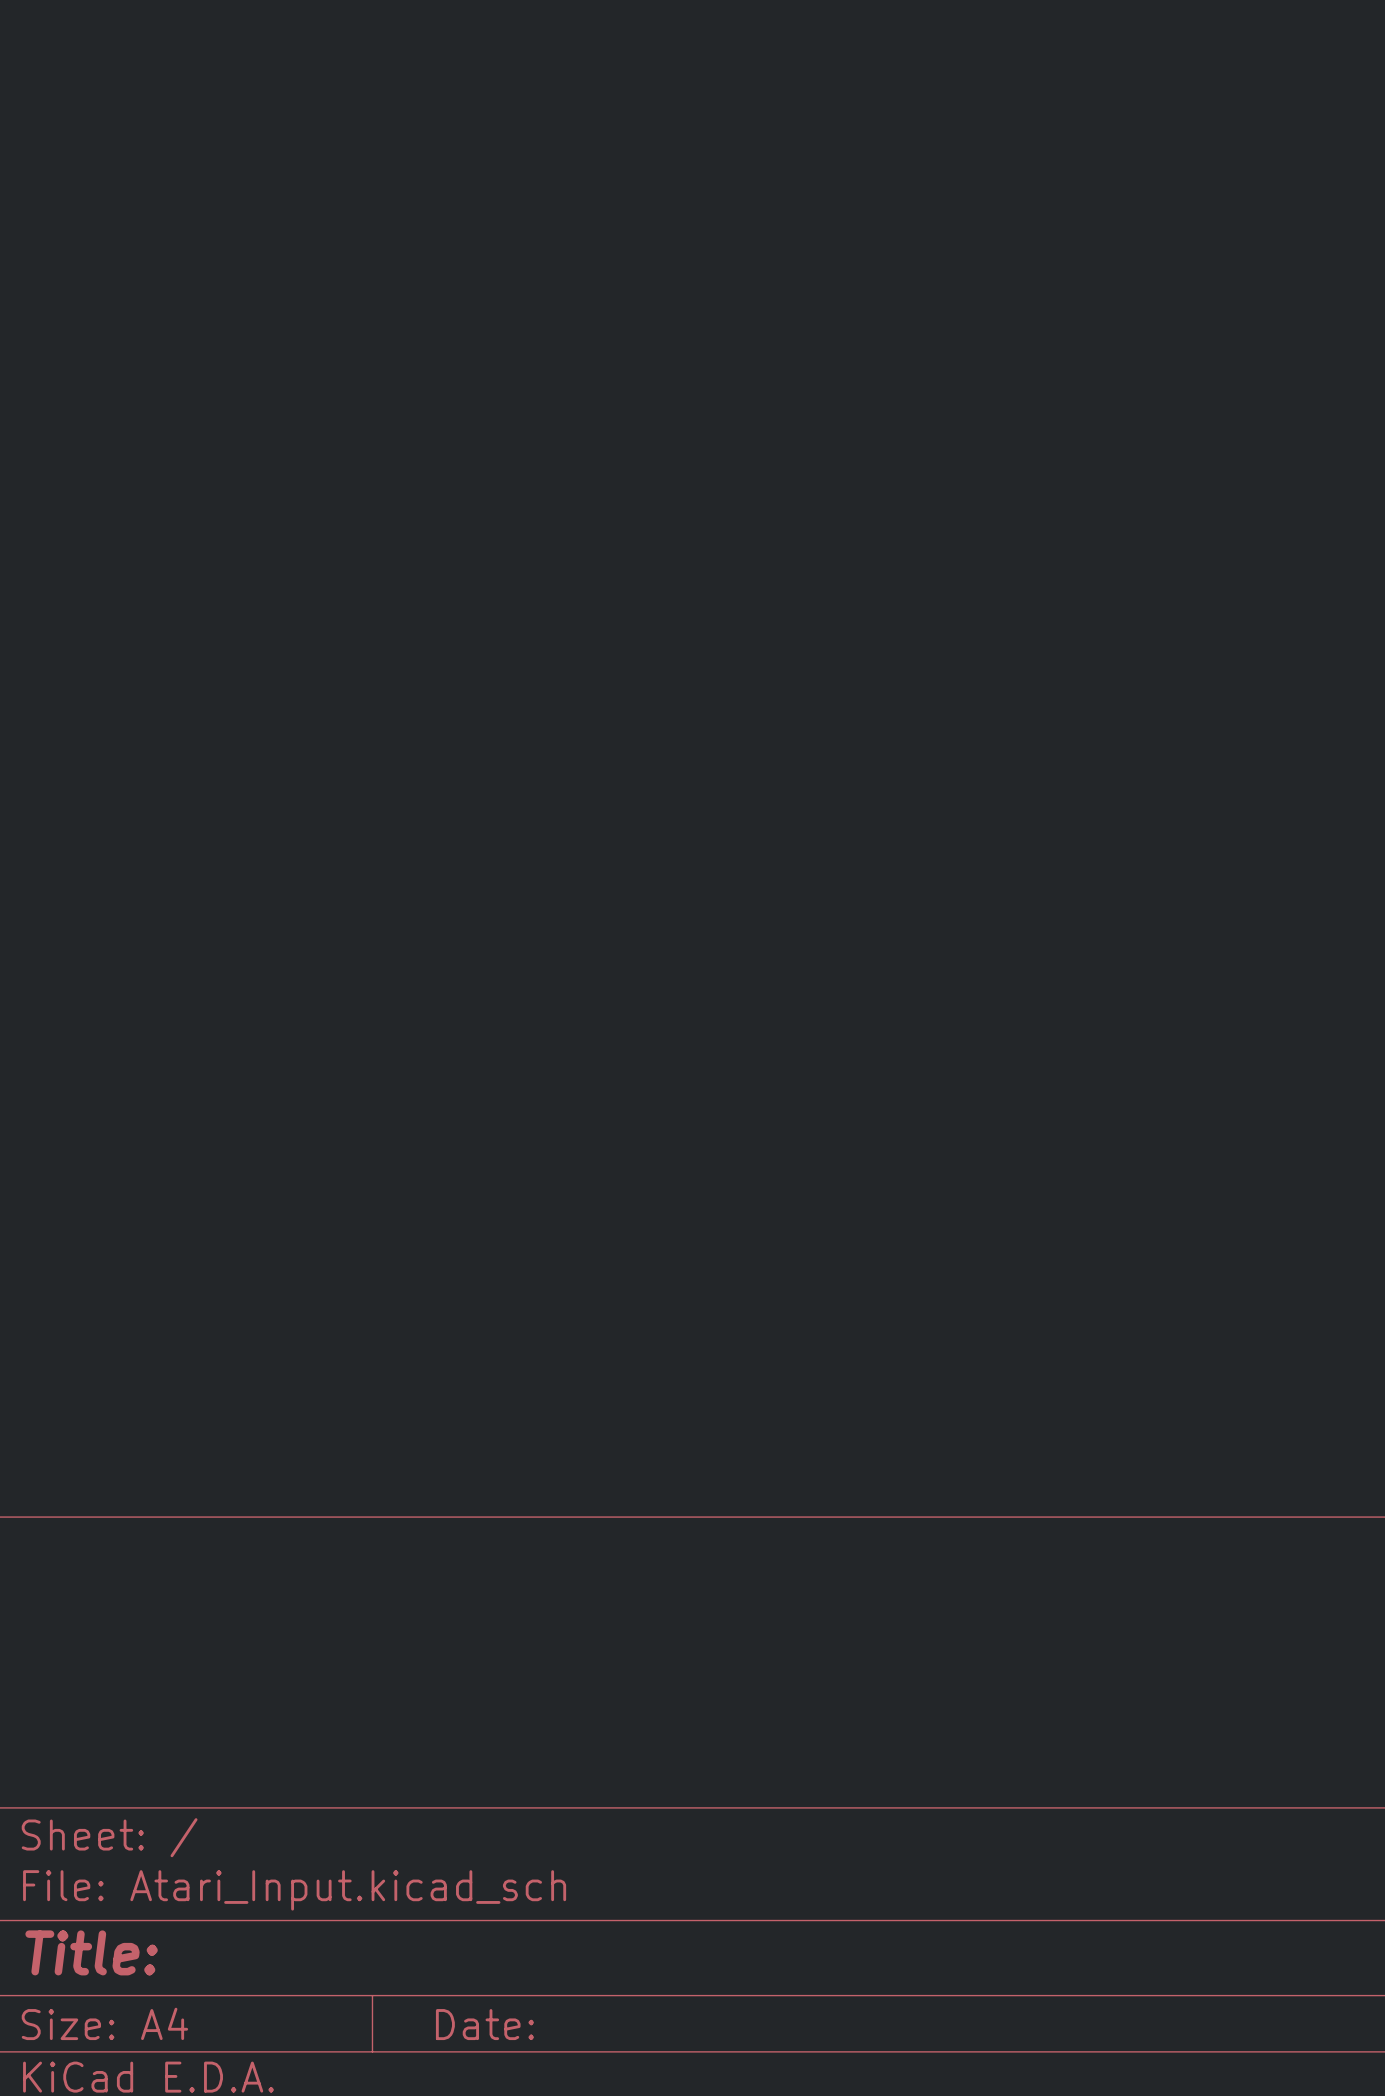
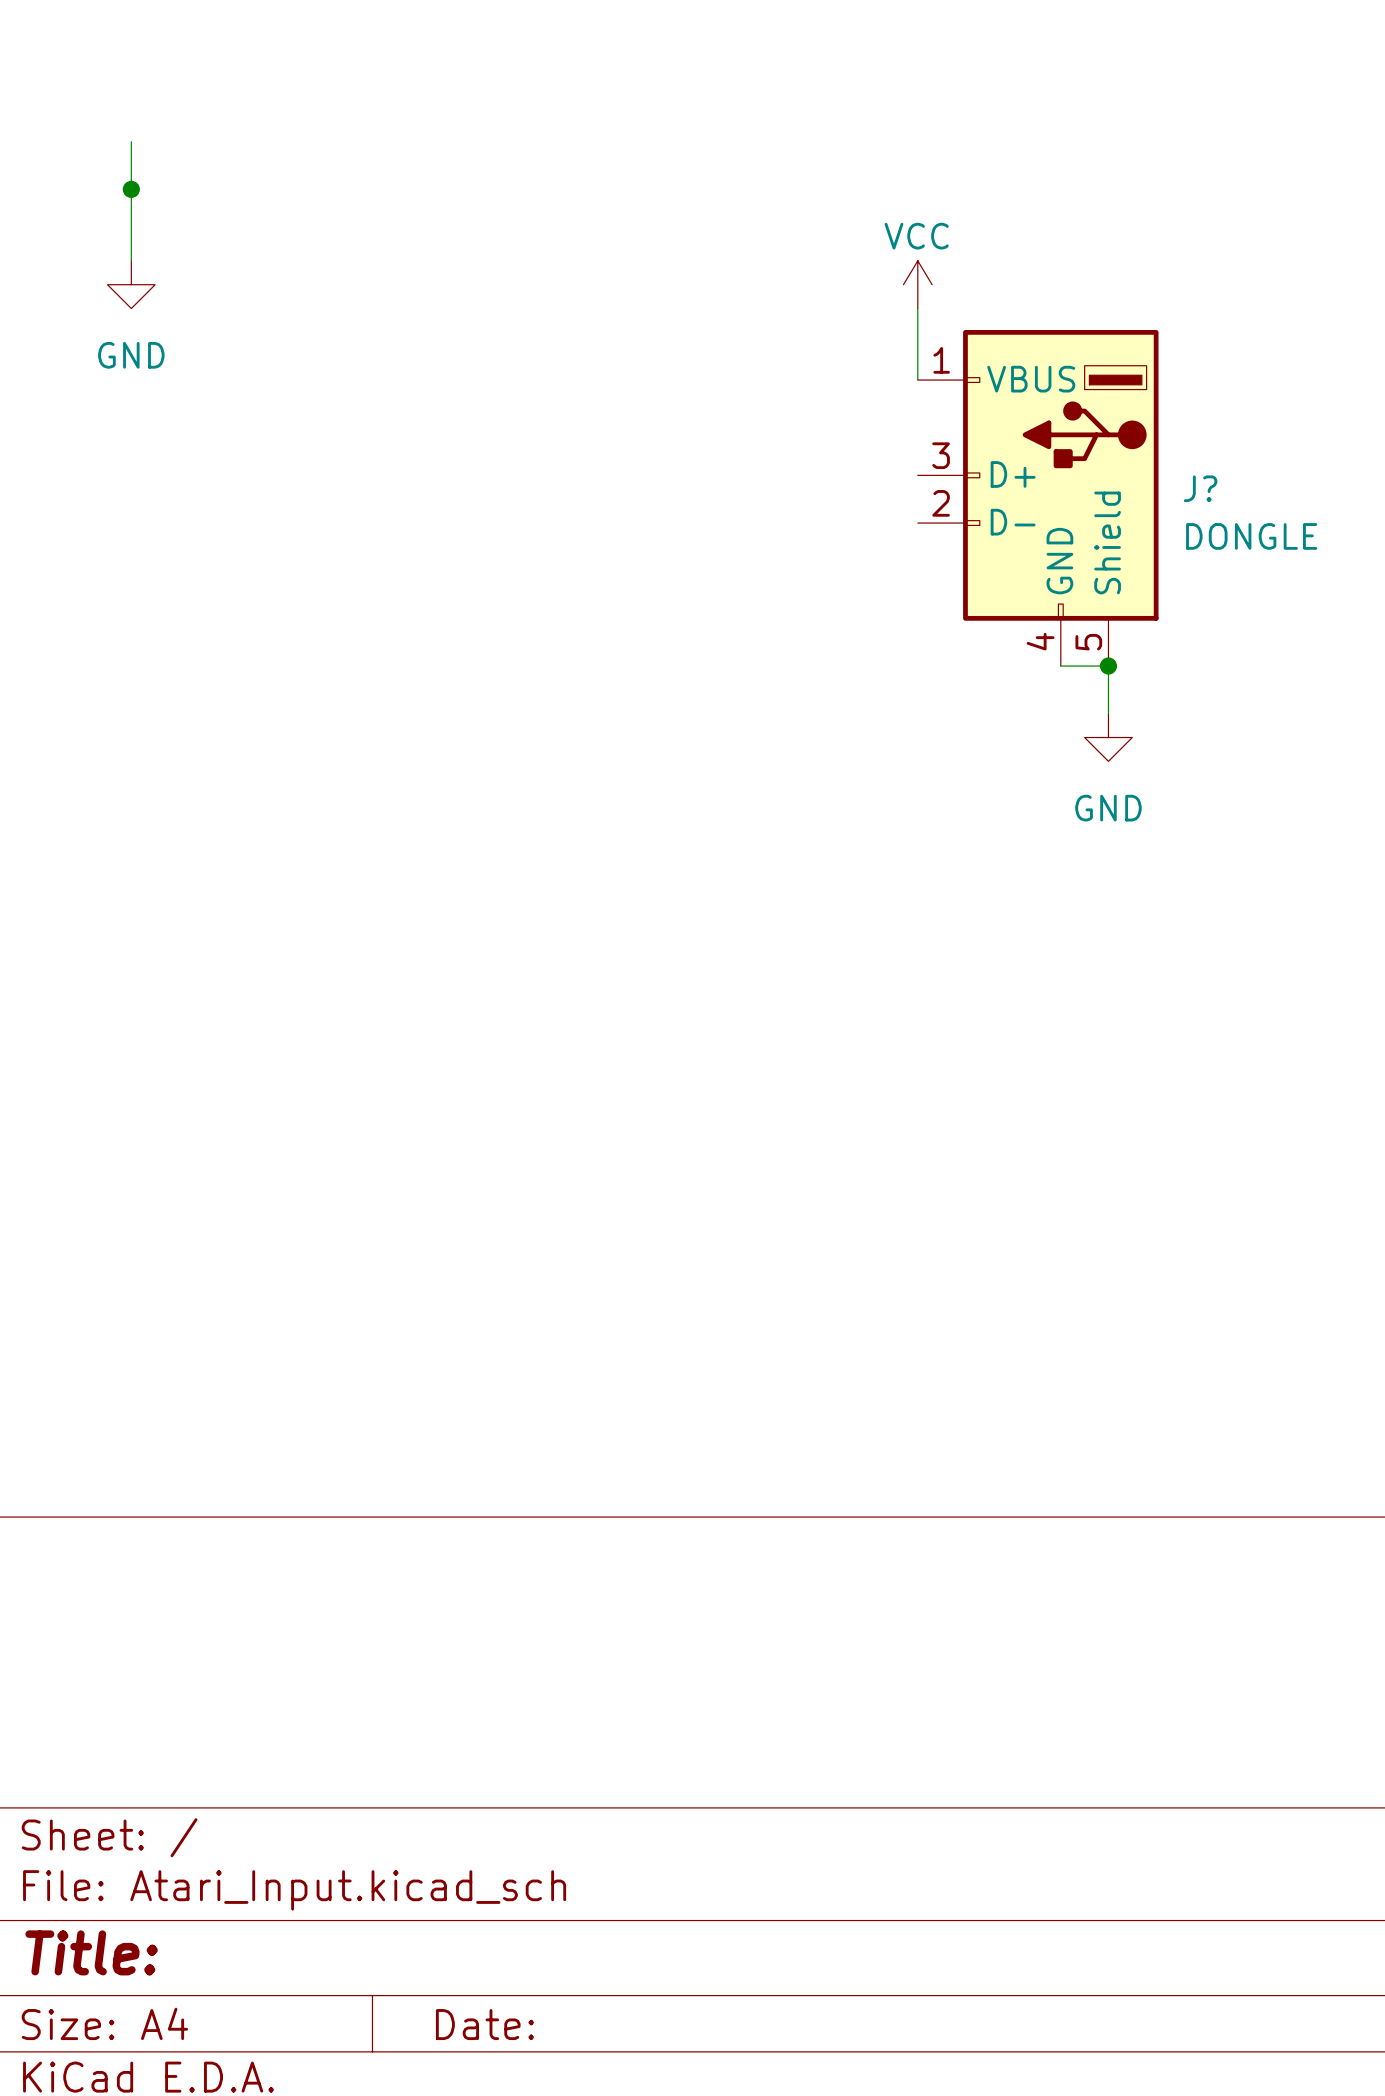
wire: none -> (131, 141) (131, 260)
junction: none -> (131, 189)
power symbol: none -> GND (131, 284)
power symbol: none -> VCC (917, 284)
wire: none -> (917, 308) (917, 380)
J?: none -> DONGLE (1038, 498)
wire: none -> (1060, 666) (1108, 666) (1108, 713)
junction: none -> (1108, 666)
power symbol: none -> GND (1108, 737)

